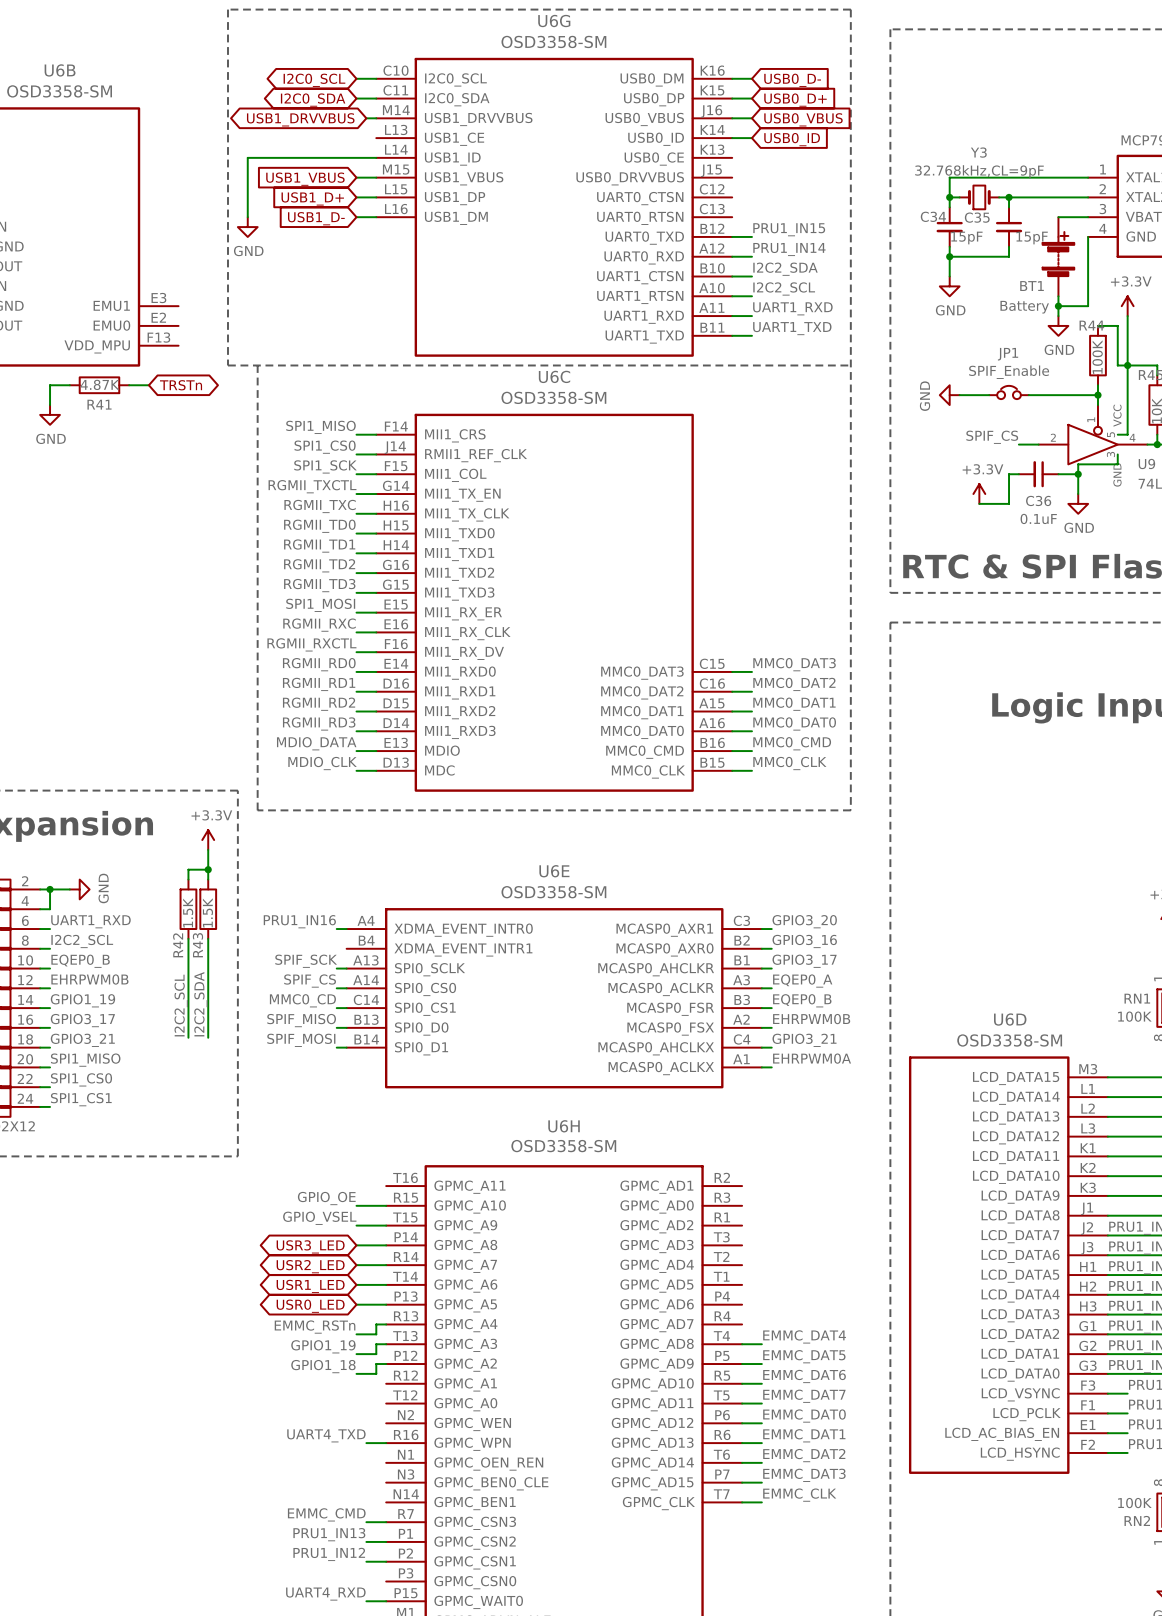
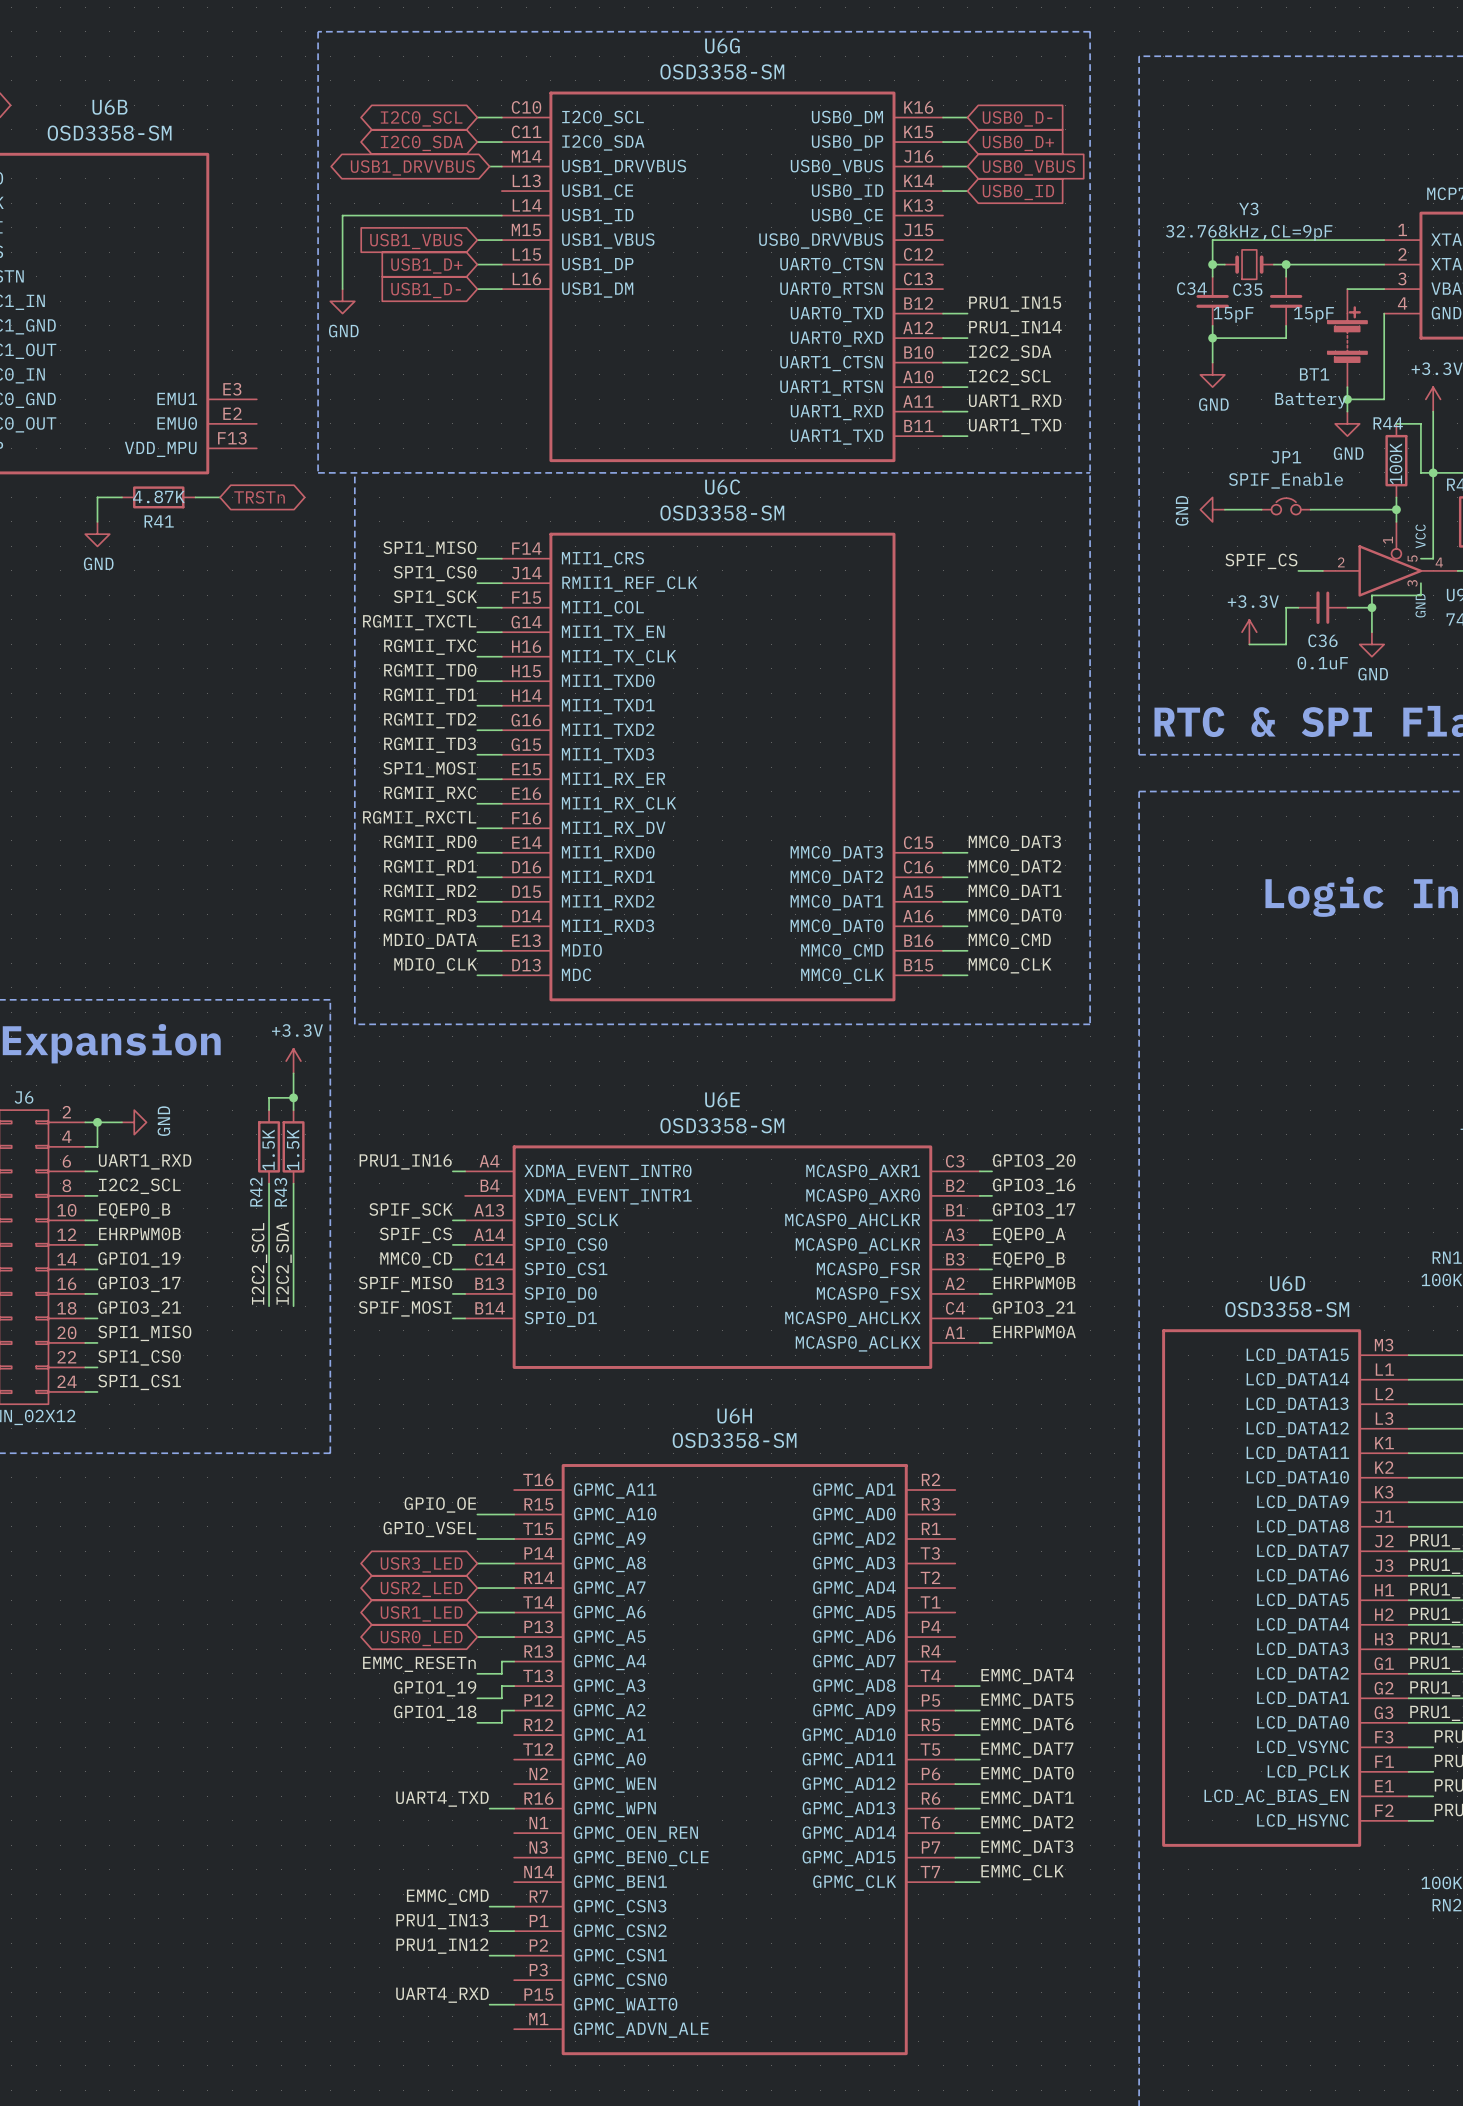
label: EMMC_RSTn (315, 1327) -> EMMC_RESETn (419, 1664)

